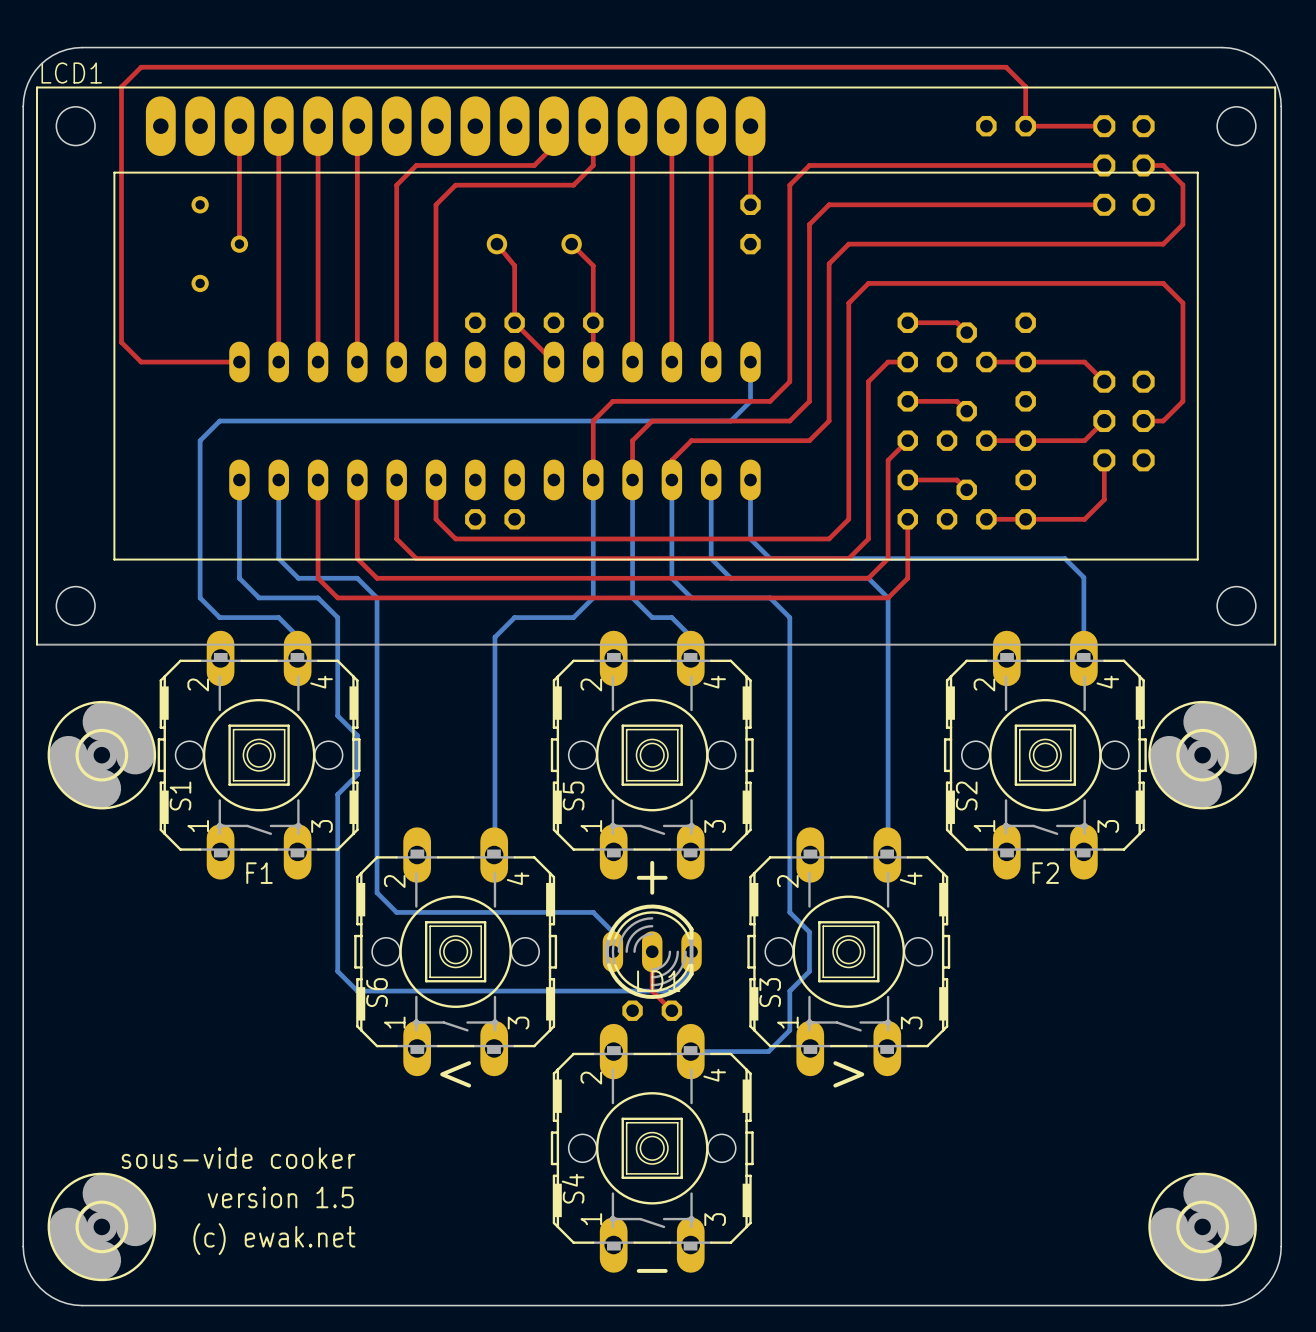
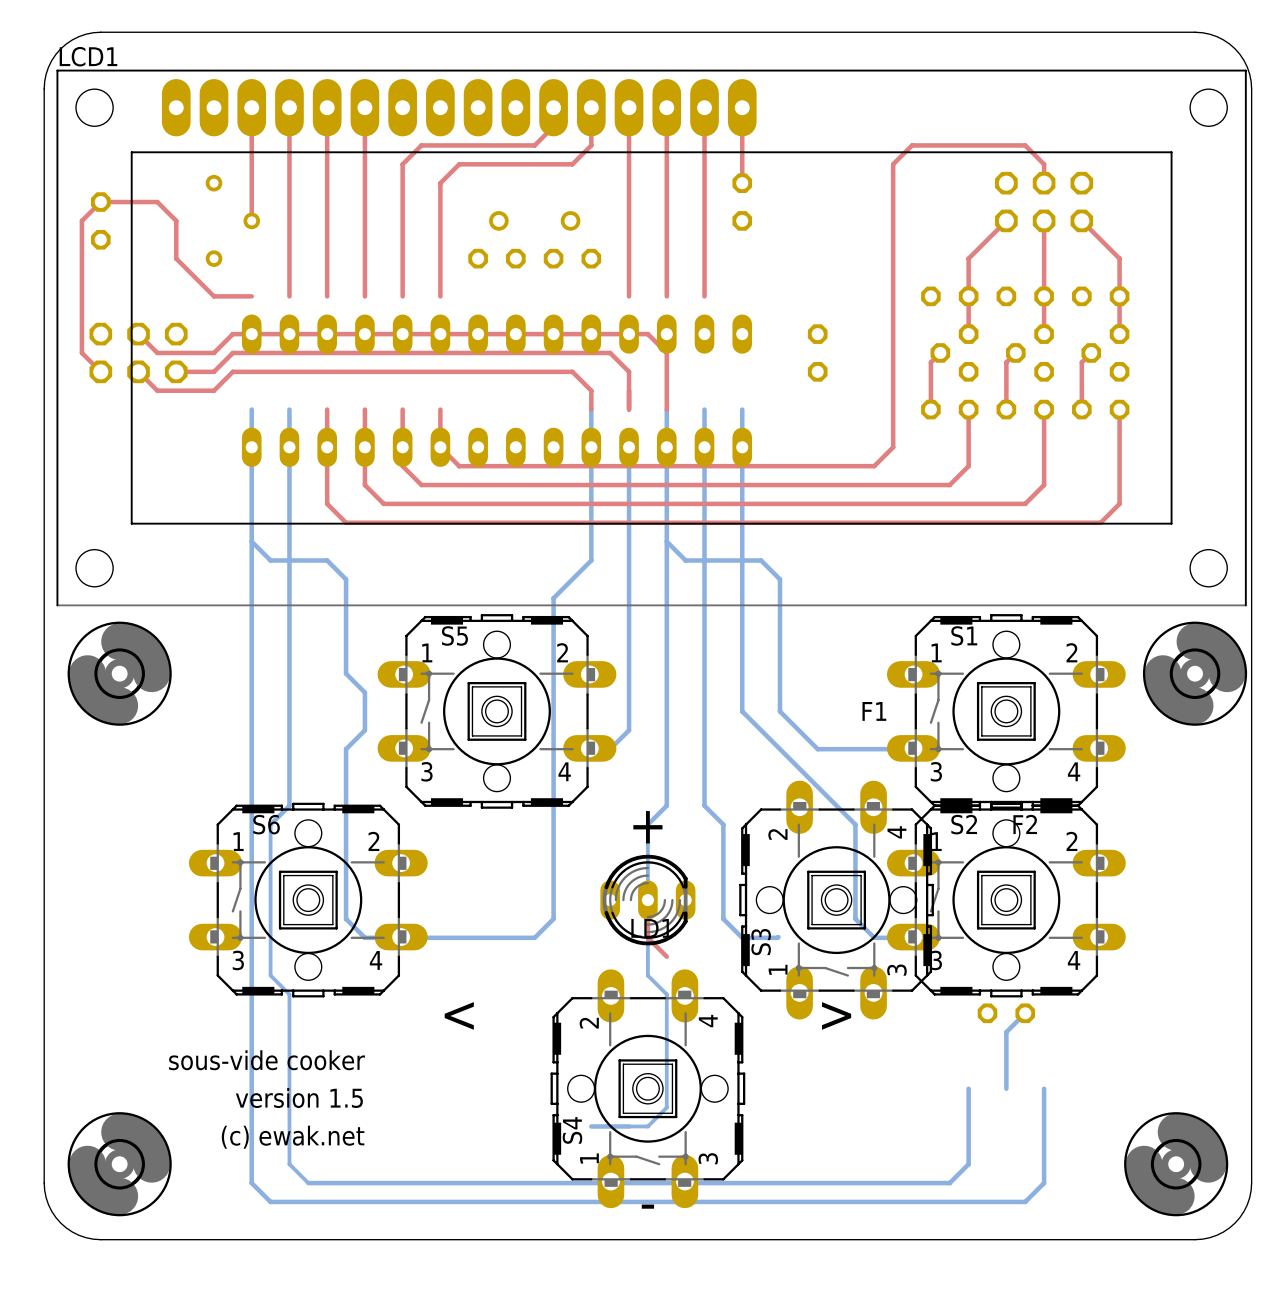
part: (1006, 126) -> none
top track: (1104, 126) (1025, 126) (1025, 86) (1006, 67) (141, 67) (121, 86) (121, 342) (141, 362) (219, 362) -> (138, 334) (157, 352) (214, 352) (232, 334)
top track: (927, 165) (809, 165) (789, 185) (789, 381) (770, 401) (612, 401) (593, 421) -> (912, 145) (893, 164) (893, 447) (874, 466) (459, 466) (440, 447) (440, 409)
top track: (1045, 165) (1104, 165) -> (1025, 145) (1044, 164) (1044, 183)
part: (1123, 165) -> none
top track: (1143, 165) (1163, 165) (1182, 185) (1182, 224) (1163, 244) (848, 244) (829, 263) (829, 421) (809, 440) (691, 440) (671, 460) (671, 479) -> none
top track: (1104, 204) (829, 204) (809, 224) (809, 401) (789, 421) (652, 421) (632, 440) (632, 479) -> none
part: none -> (1044, 202)
part: none -> (100, 220)
top track: (496, 244) (514, 265) (514, 322) (553, 362) -> none
top track: (571, 244) (593, 265) (593, 362) -> none
top track: none -> (1044, 220) (1044, 334)
top track: none -> (1081, 220) (1119, 258) (1119, 334)
top track: none -> (251, 296) (214, 296) (176, 258) (176, 220) (157, 202) (100, 202) (81, 220) (81, 352) (100, 371)
top track: (278, 322) (278, 362) -> none
top track: (318, 322) (318, 362) -> (327, 409) (327, 447)
top track: (357, 322) (357, 362) -> (364, 409) (364, 447)
top track: (396, 322) (396, 362) -> (402, 409) (402, 447)
top track: (436, 322) (436, 362) -> none
part position: (494, 322) -> (496, 258)
part position: (573, 322) -> (572, 258)
top track: (632, 322) (632, 362) -> none
top track: (671, 322) (671, 362) -> none
top track: (711, 322) (711, 362) -> none
top track: (907, 322) (956, 322) (966, 332) -> none
part: none -> (949, 296)
part: none -> (1100, 296)
part: (907, 342) -> none
part rotation: 0° (1025, 342) -> 90° clockwise (1025, 296)
part rotation: 0° (966, 347) -> 90° counterclockwise (954, 352)
top track: none -> (251, 334) (647, 334) (666, 352) (666, 409)
bottom track: (750, 362) (750, 401) (730, 421) (219, 421) (200, 440) (200, 597) (219, 617) (278, 617) (298, 637) (297, 658) -> none
top track: (907, 362) (888, 362) (868, 381) (868, 538) (848, 558) -> (1119, 409) (1119, 503) (1100, 522) (836, 522)
top track: (986, 362) (1084, 362) (1104, 381) -> (968, 334) (968, 258) (1006, 220)
part: none -> (138, 352)
part: none -> (817, 352)
top track: none -> (940, 352) (930, 362) (930, 409)
top track: none -> (1015, 352) (1006, 362) (1006, 409)
part: none -> (1029, 352)
top track: none -> (1091, 352) (1081, 362) (1081, 409)
part: none -> (1105, 352)
part footprint: [936, 400, 997, 451] -> [921, 399, 979, 420]
top track: none -> (138, 371) (157, 390) (214, 390) (232, 371) (572, 371) (591, 390)
top track: none -> (176, 371) (214, 371) (232, 352) (610, 352) (629, 371) (629, 409)
top track: (907, 401) (956, 401) (966, 411) -> none
part: (907, 421) -> none
part rotation: 0° (1025, 421) -> 90° clockwise (1025, 409)
top track: (1104, 421) (1084, 440) (986, 440) -> (402, 466) (421, 485) (949, 485) (968, 466) (968, 409)
part: (1123, 421) -> none
top track: (1143, 421) (1163, 421) (1182, 401) (1182, 303) (1163, 283) (868, 283) (848, 303) (848, 519) (829, 538) -> (1044, 409) (1044, 485) (1025, 503) (817, 503)
bottom track: none -> (251, 409) (251, 447)
bottom track: none -> (289, 409) (289, 447)
bottom track: none -> (591, 409) (591, 447)
top track: (593, 440) (593, 479) -> none
bottom track: none -> (666, 409) (666, 447)
bottom track: none -> (704, 409) (704, 447)
bottom track: none -> (742, 409) (742, 447)
top track: (907, 440) (888, 460) (888, 558) (868, 578) (377, 578) (357, 558) (357, 519) -> none
part: none -> (1100, 409)
top track: (1104, 460) (1104, 499) (1084, 519) (986, 519) -> none
top track: (436, 479) (436, 519) (455, 538) -> (364, 485) (383, 503) (459, 503)
top track: (907, 479) (956, 479) (966, 489) -> none
top track: (396, 499) (396, 538) (416, 558) -> (327, 503) (346, 522) (421, 522)
part: (907, 499) -> none
part: (1025, 499) -> none
part: (966, 504) -> none
part: (494, 519) -> none
top track: (907, 519) (907, 578) (888, 597) (337, 597) (318, 578) (318, 538) -> none
bottom track: (750, 538) (770, 558) (1065, 558) (1083, 577) (1083, 658) -> (742, 503) (742, 711) (855, 824) (855, 918) (874, 937) (913, 937)
bottom track: (278, 558) (298, 578) (357, 578) (377, 597) (377, 892) (396, 912) (593, 912) (612, 932) (612, 951) -> (289, 522) (289, 805) (270, 824) (270, 975) (289, 994) (289, 1164) (308, 1183) (949, 1183) (968, 1164) (968, 1088)
bottom track: (711, 558) (730, 578) (868, 578) (888, 597) (887, 855) -> (704, 522) (704, 805) (723, 824) (723, 918) (742, 937) (778, 937)
bottom track: none -> (251, 541) (251, 1183) (270, 1201) (1025, 1201) (1044, 1183) (1044, 1088)
bottom track: none -> (666, 541) (666, 805) (647, 824) (647, 975) (666, 994) (666, 1107) (647, 1126) (591, 1126)
bottom track: (632, 597) (652, 617) (671, 617) (691, 637) (690, 658) -> (629, 560) (629, 730) (610, 749) (589, 748)
bottom track: (573, 617) (514, 617) (494, 637) (494, 855) -> (572, 579) (553, 598) (553, 918) (534, 937)
part position: (101, 755) -> (119, 673)
S1 rotation: 0° (259, 755) -> 90° clockwise (1006, 711)
S1 position: (259, 755) -> (1006, 711)
S5 rotation: 0° (652, 755) -> 90° clockwise (496, 711)
S5 position: (652, 755) -> (496, 711)
bottom track: (789, 755) (789, 912) (809, 932) (809, 971) (789, 991) (789, 1030) (768, 1051) (690, 1051) -> (779, 711) (817, 749) (913, 748)
text: none -> F1 (874, 711)
S2 rotation: 0° (1045, 755) -> 90° clockwise (1006, 900)
S2 position: (1045, 755) -> (1006, 900)
part position: (1202, 755) -> (1195, 673)
text: F1 (259, 873) -> none
S6 rotation: 0° (455, 951) -> 90° clockwise (308, 900)
S6 position: (455, 951) -> (308, 900)
bottom track: (691, 951) (691, 971) (671, 991) (534, 991) -> none
part: (652, 1010) -> none
part: none -> (1006, 1013)
bottom track: none -> (1025, 1013) (1006, 1032) (1006, 1088)
text: none -> sous-vide cooker (266, 1060)
text: sous-vide cooker (238, 1158) -> version 1.5 (299, 1097)
text: version 1.5 (280, 1197) -> (c) ewak.net (293, 1137)
text: (c) ewak.net (274, 1239) -> none

